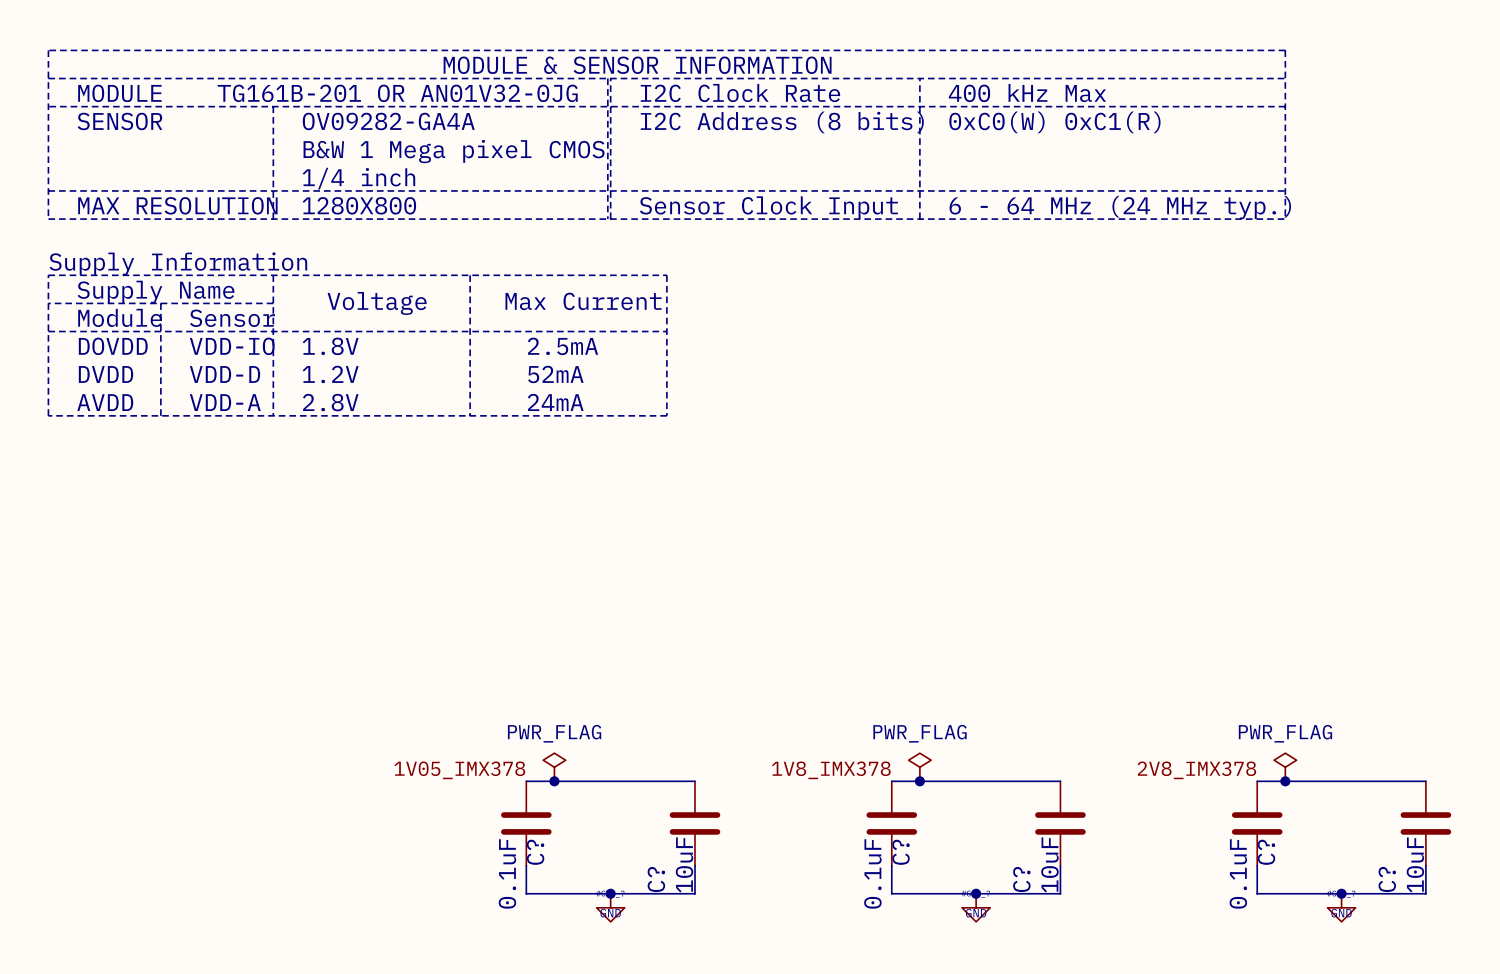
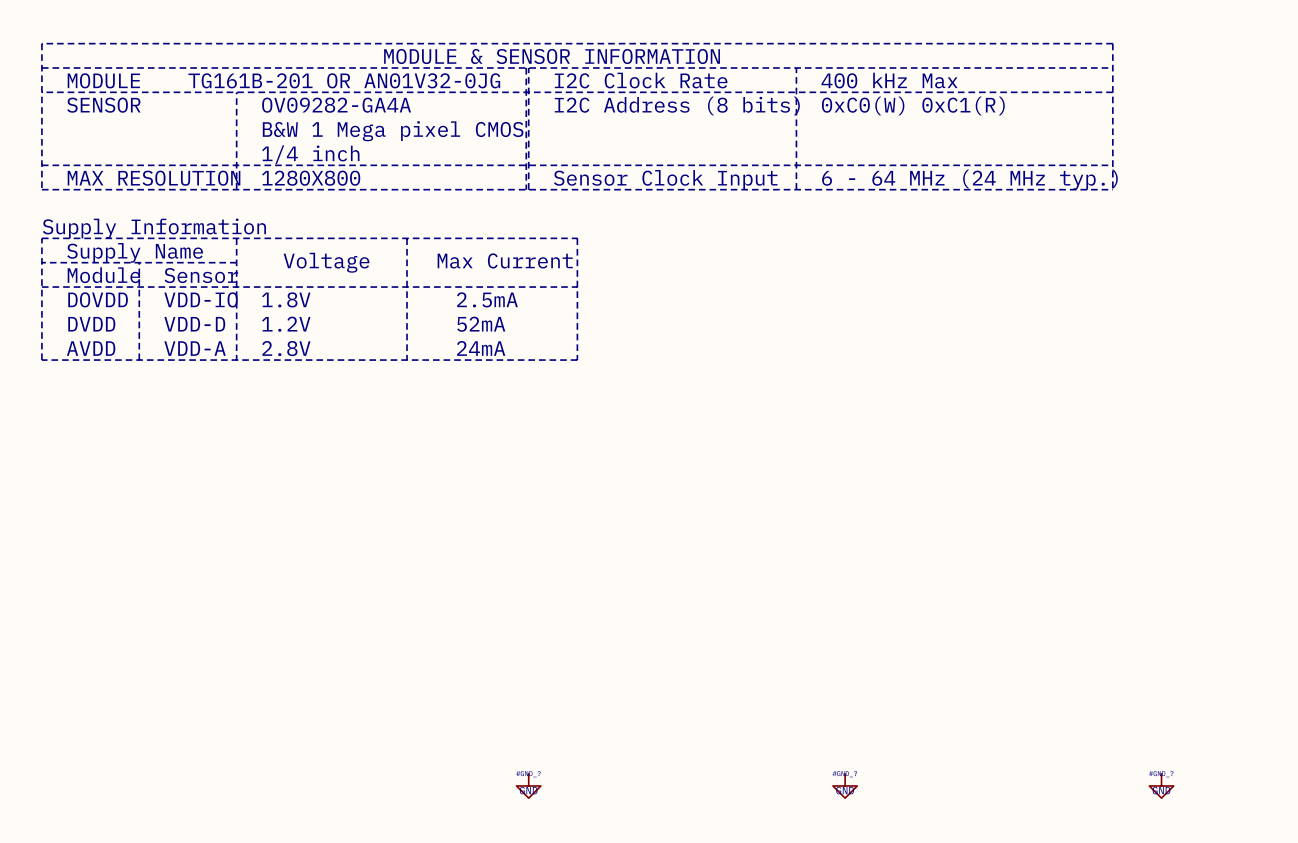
power symbol: PWR_FLAG (554, 767) -> none
power symbol: PWR_FLAG (919, 767) -> none
power symbol: PWR_FLAG (1285, 767) -> none
label: 1V05_IMX378 (459, 770) -> none
label: 1V8_IMX378 (831, 770) -> none
label: 2V8_IMX378 (1196, 770) -> none
wire: (526, 781) (695, 781) -> none
junction: (554, 781) -> none
wire: (891, 781) (1060, 781) -> none
junction: (919, 781) -> none
wire: (1257, 781) (1425, 781) -> none
junction: (1285, 781) -> none
C?: 0.1uF (526, 823) -> none
C?: 10uF (695, 823) -> none
C?: 0.1uF (891, 823) -> none
C?: 10uF (1060, 823) -> none
C?: 0.1uF (1257, 823) -> none
C?: 10uF (1425, 823) -> none
wire: (526, 865) (526, 893) (695, 893) (695, 865) -> none
wire: (891, 865) (891, 893) (1060, 893) (1060, 865) -> none
wire: (1257, 865) (1257, 893) (1425, 893) (1425, 865) -> none
junction: (610, 893) -> none
junction: (976, 893) -> none
junction: (1341, 893) -> none

